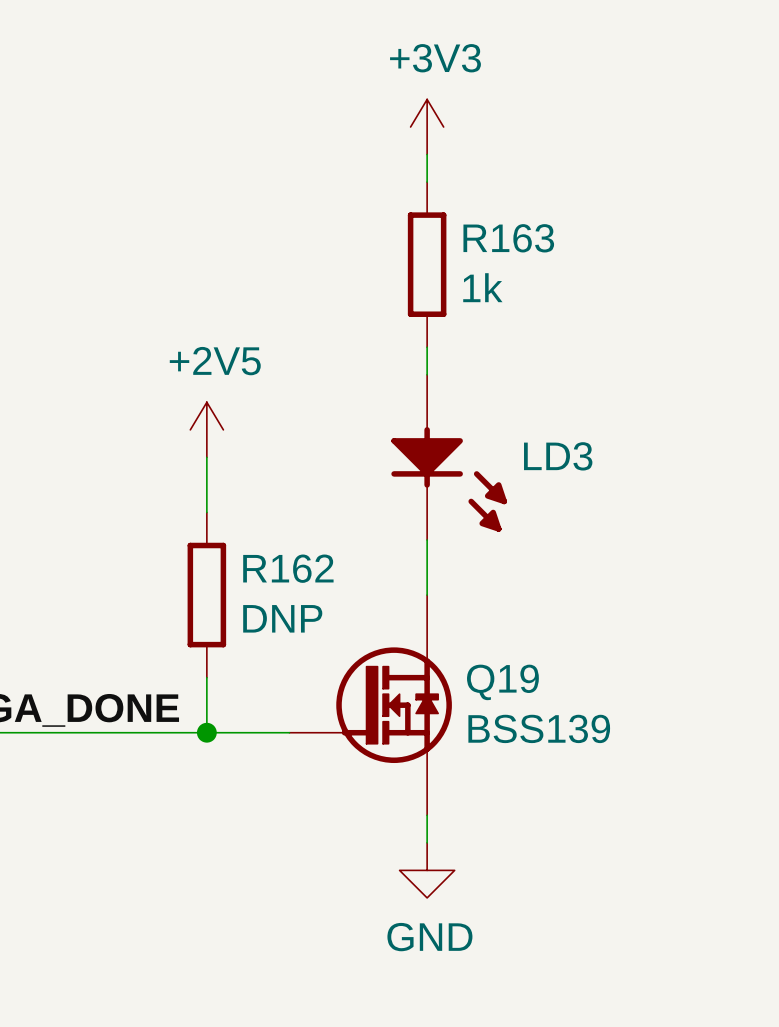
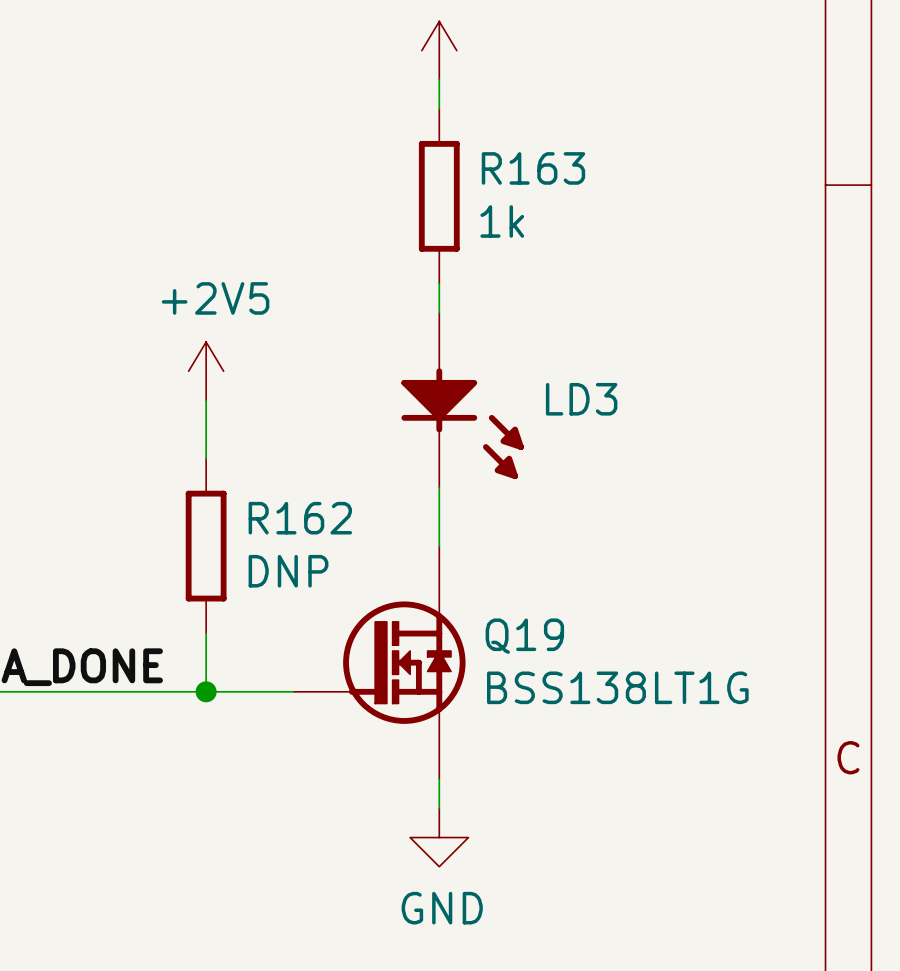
Q19 value: BSS139 (539, 728) -> BSS138LT1G (617, 687)

